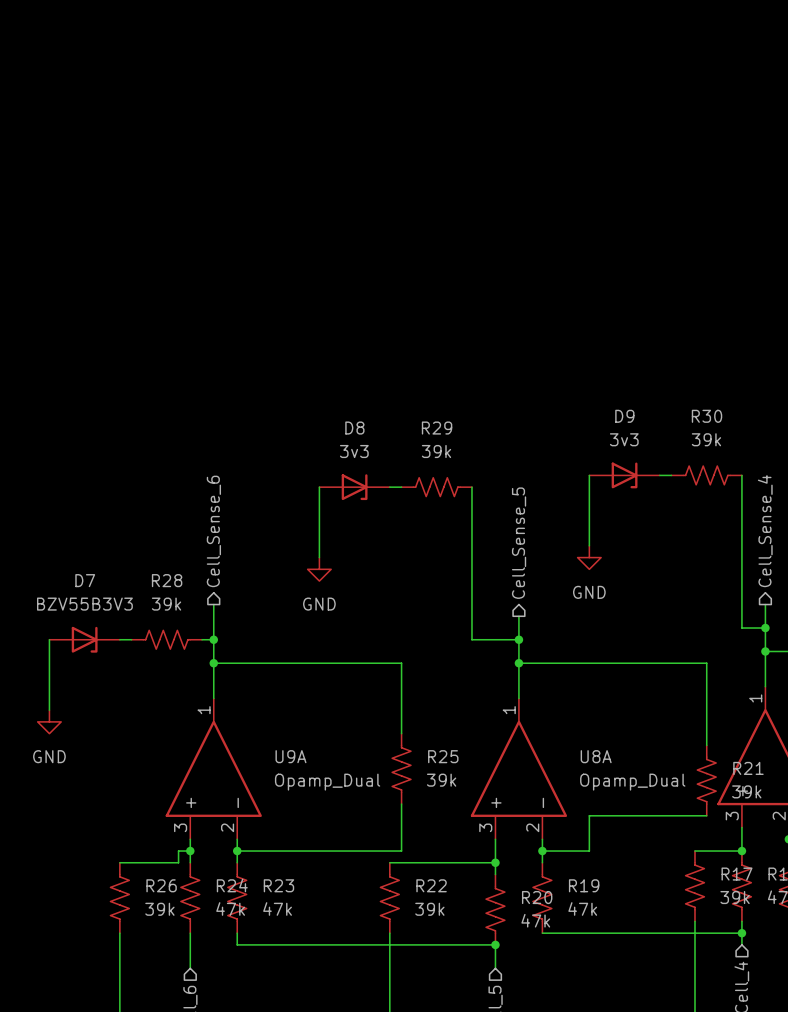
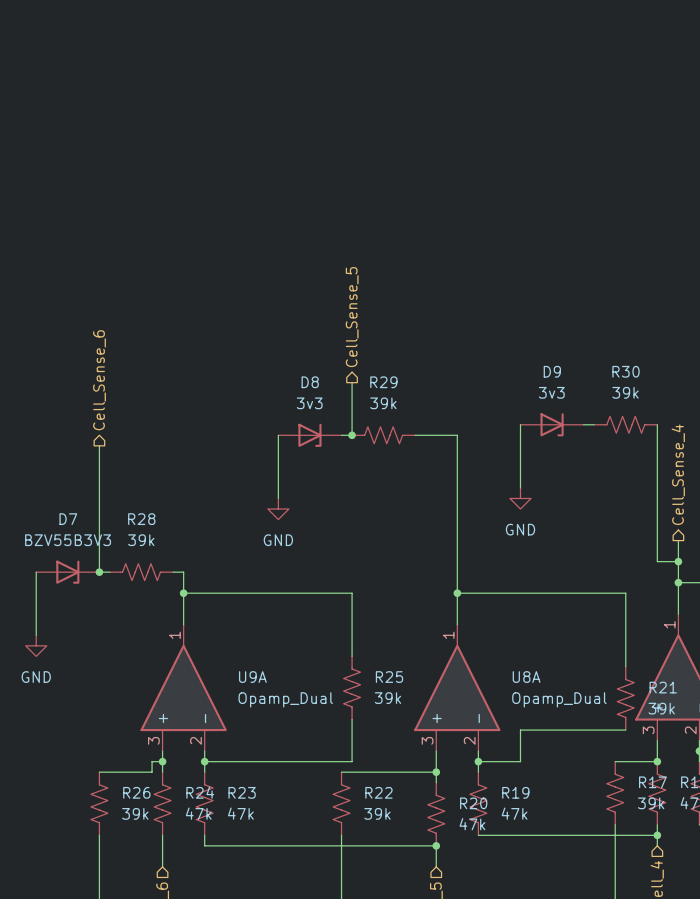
wire: none -> (352, 382) (352, 435)
junction: none -> (352, 435)
wire: (471, 487) (471, 639) (518, 639) -> (415, 435) (457, 435) (457, 551)
wire: none -> (99, 445) (99, 572)
hierarchical label position: Cell_Sense_6 (213, 531) -> Cell_Sense_6 (99, 380)
hierarchical label position: Cell_Sense_5 (519, 543) -> Cell_Sense_5 (352, 317)
wire: (213, 604) (213, 639) -> none
junction: none -> (99, 572)
junction: (213, 639) -> none
junction: (518, 639) -> none

